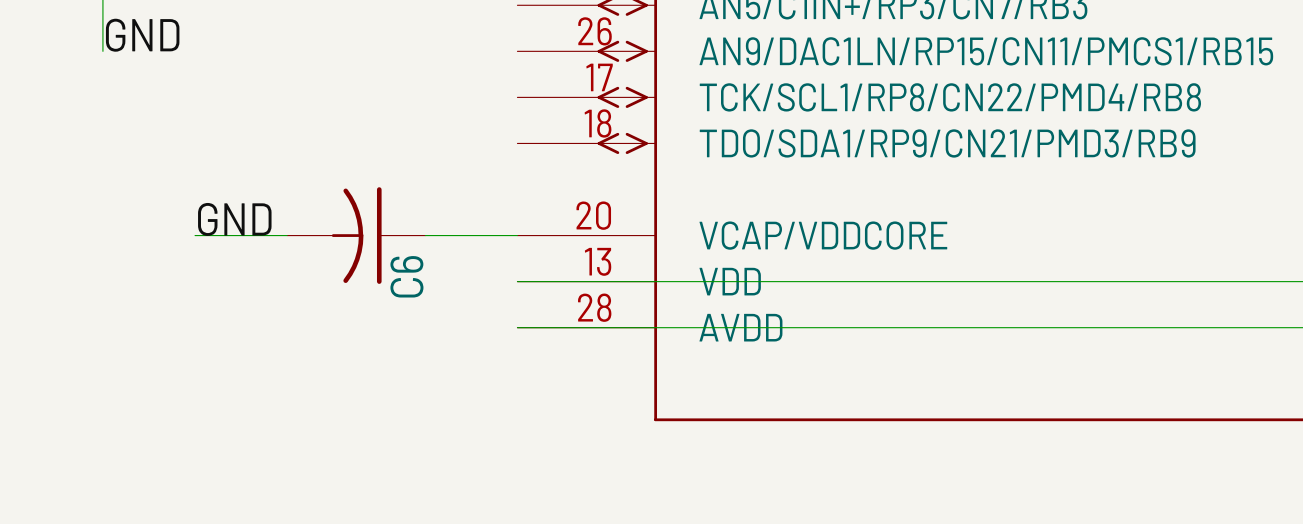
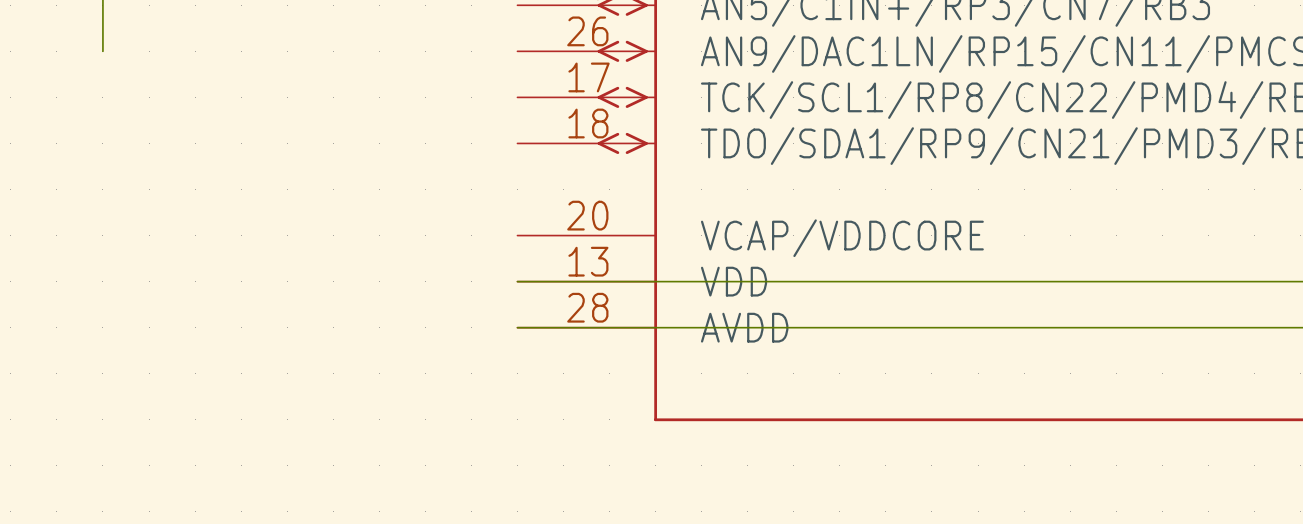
label: GND (142, 35) -> none
label: GND (234, 219) -> none
wire: (195, 235) (287, 235) -> none
C6: (356, 235) -> none
wire: (425, 235) (517, 235) -> none

